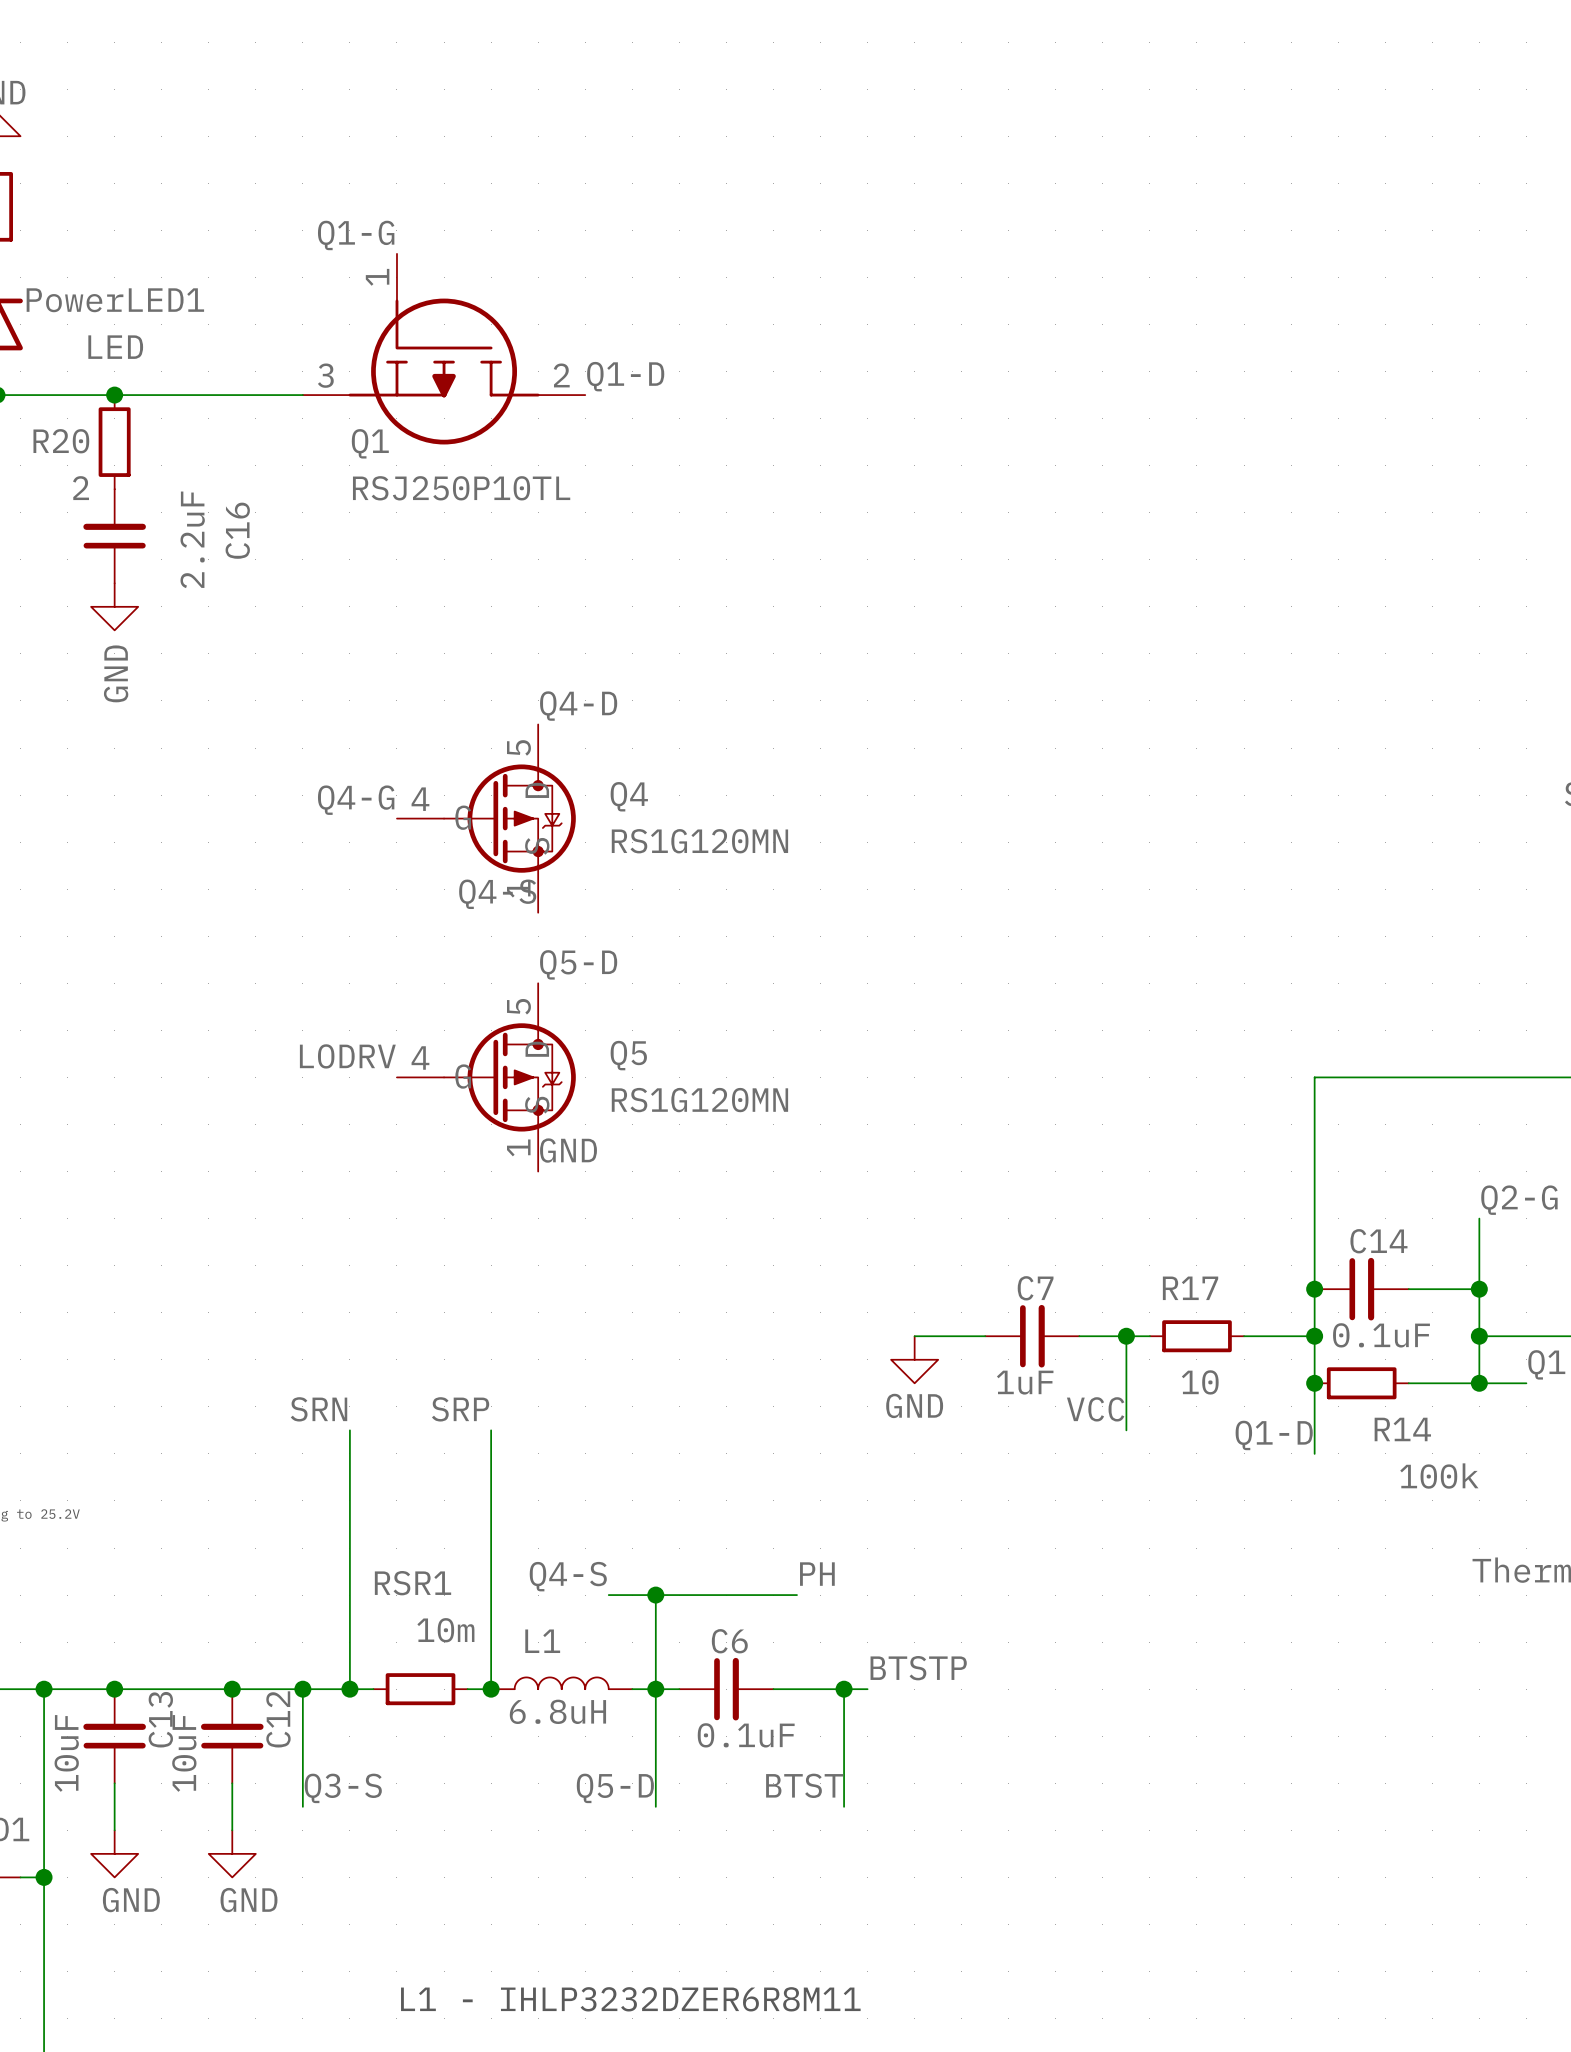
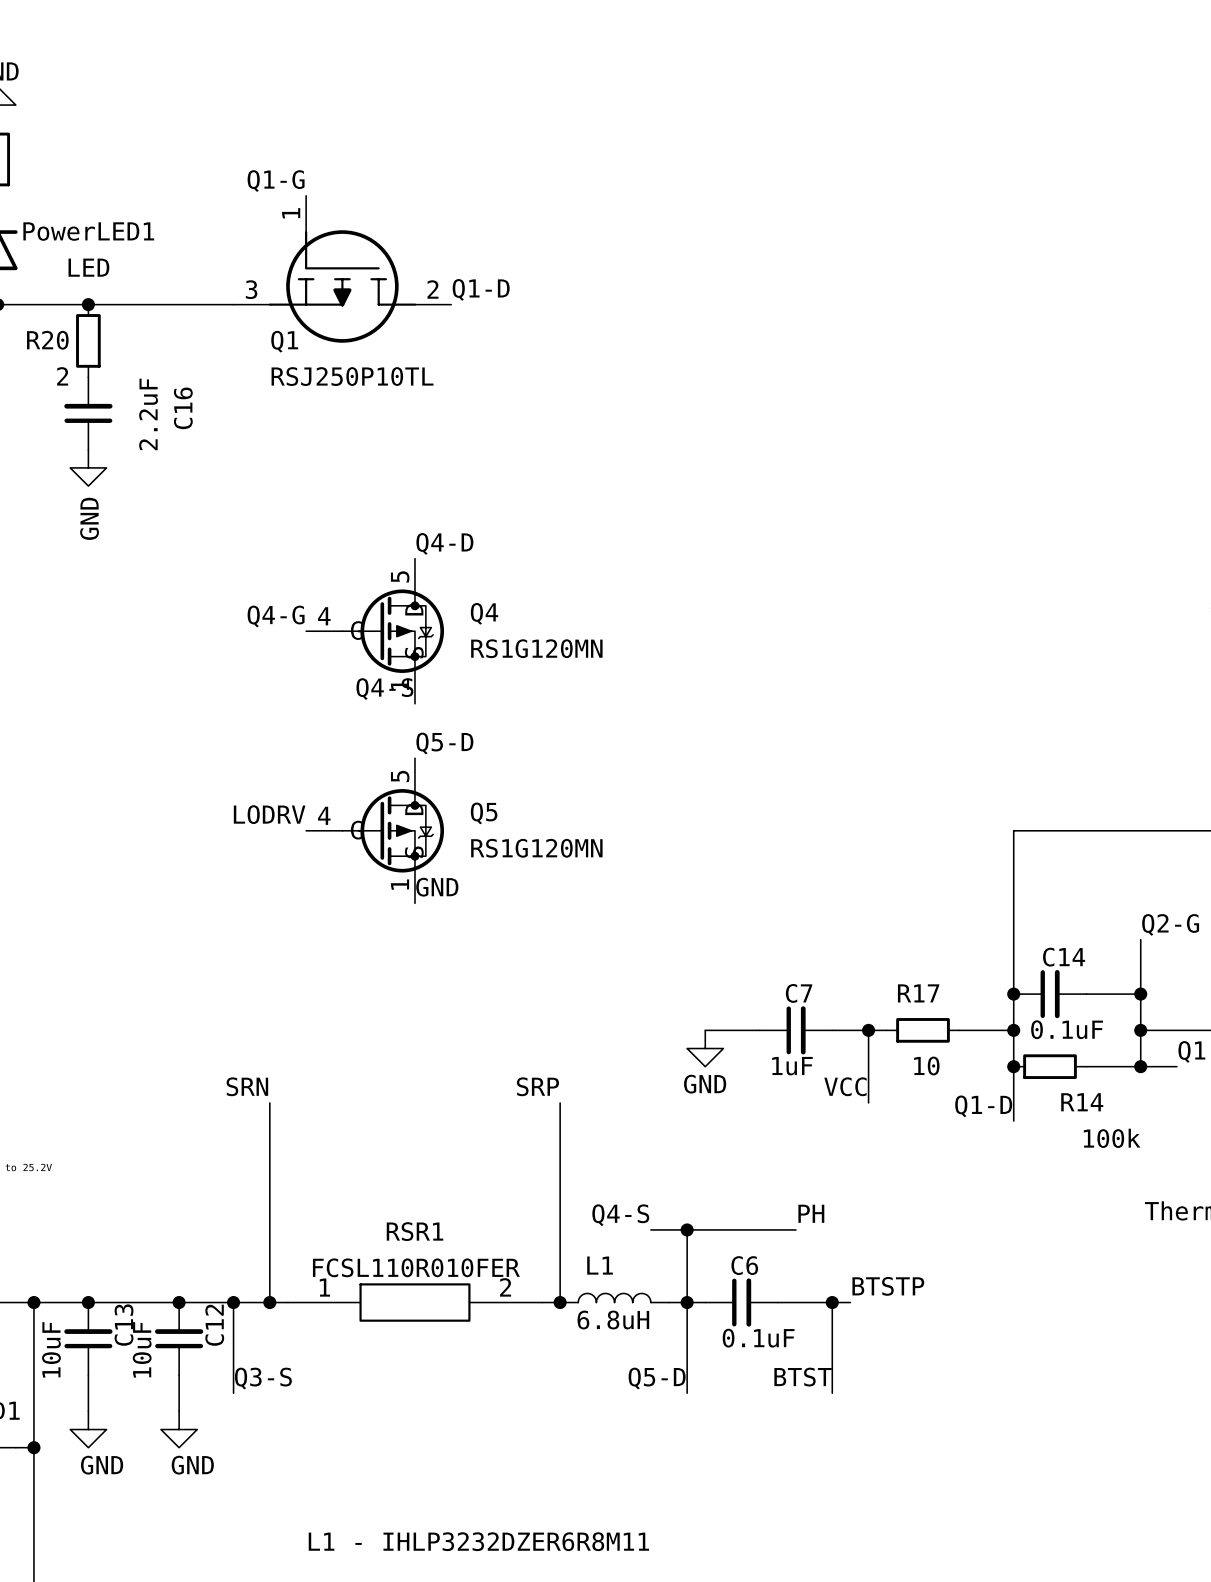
label position: SRP (460, 1409) -> SRP (537, 1086)
wire: (491, 1430) (491, 1689) (467, 1689) -> (560, 1102) (560, 1302) (541, 1302)
label position: PH (817, 1574) -> PH (811, 1213)
label position: Q4-S (568, 1576) -> Q4-S (620, 1215)
wire: (608, 1595) (796, 1595) -> (650, 1229) (796, 1229)
wire: (655, 1595) (655, 1806) -> (687, 1229) (687, 1393)
junction: (655, 1595) -> none
junction: none -> (687, 1229)
RSR1 value: 10m (445, 1630) -> FCSL110R010FER (416, 1267)
label position: BTSTP (918, 1668) -> BTSTP (888, 1286)
RSR1 symbol: [373, 1673, 468, 1706] -> [287, 1283, 542, 1322]
L1 position: (561, 1683) -> (614, 1297)
junction: (491, 1689) -> none
junction: (655, 1689) -> none
junction: none -> (560, 1302)
C6 position: (726, 1689) -> (741, 1302)
wire: (773, 1689) (867, 1689) -> (705, 1302) (668, 1302)
wire: (844, 1689) (844, 1806) -> (832, 1302) (832, 1393)
junction position: (844, 1689) -> (687, 1302)
wire: none -> (777, 1302) (850, 1302)
junction: none -> (832, 1302)
label position: BTST (804, 1785) -> BTST (803, 1377)
label position: Q5-D (615, 1788) -> Q5-D (657, 1378)

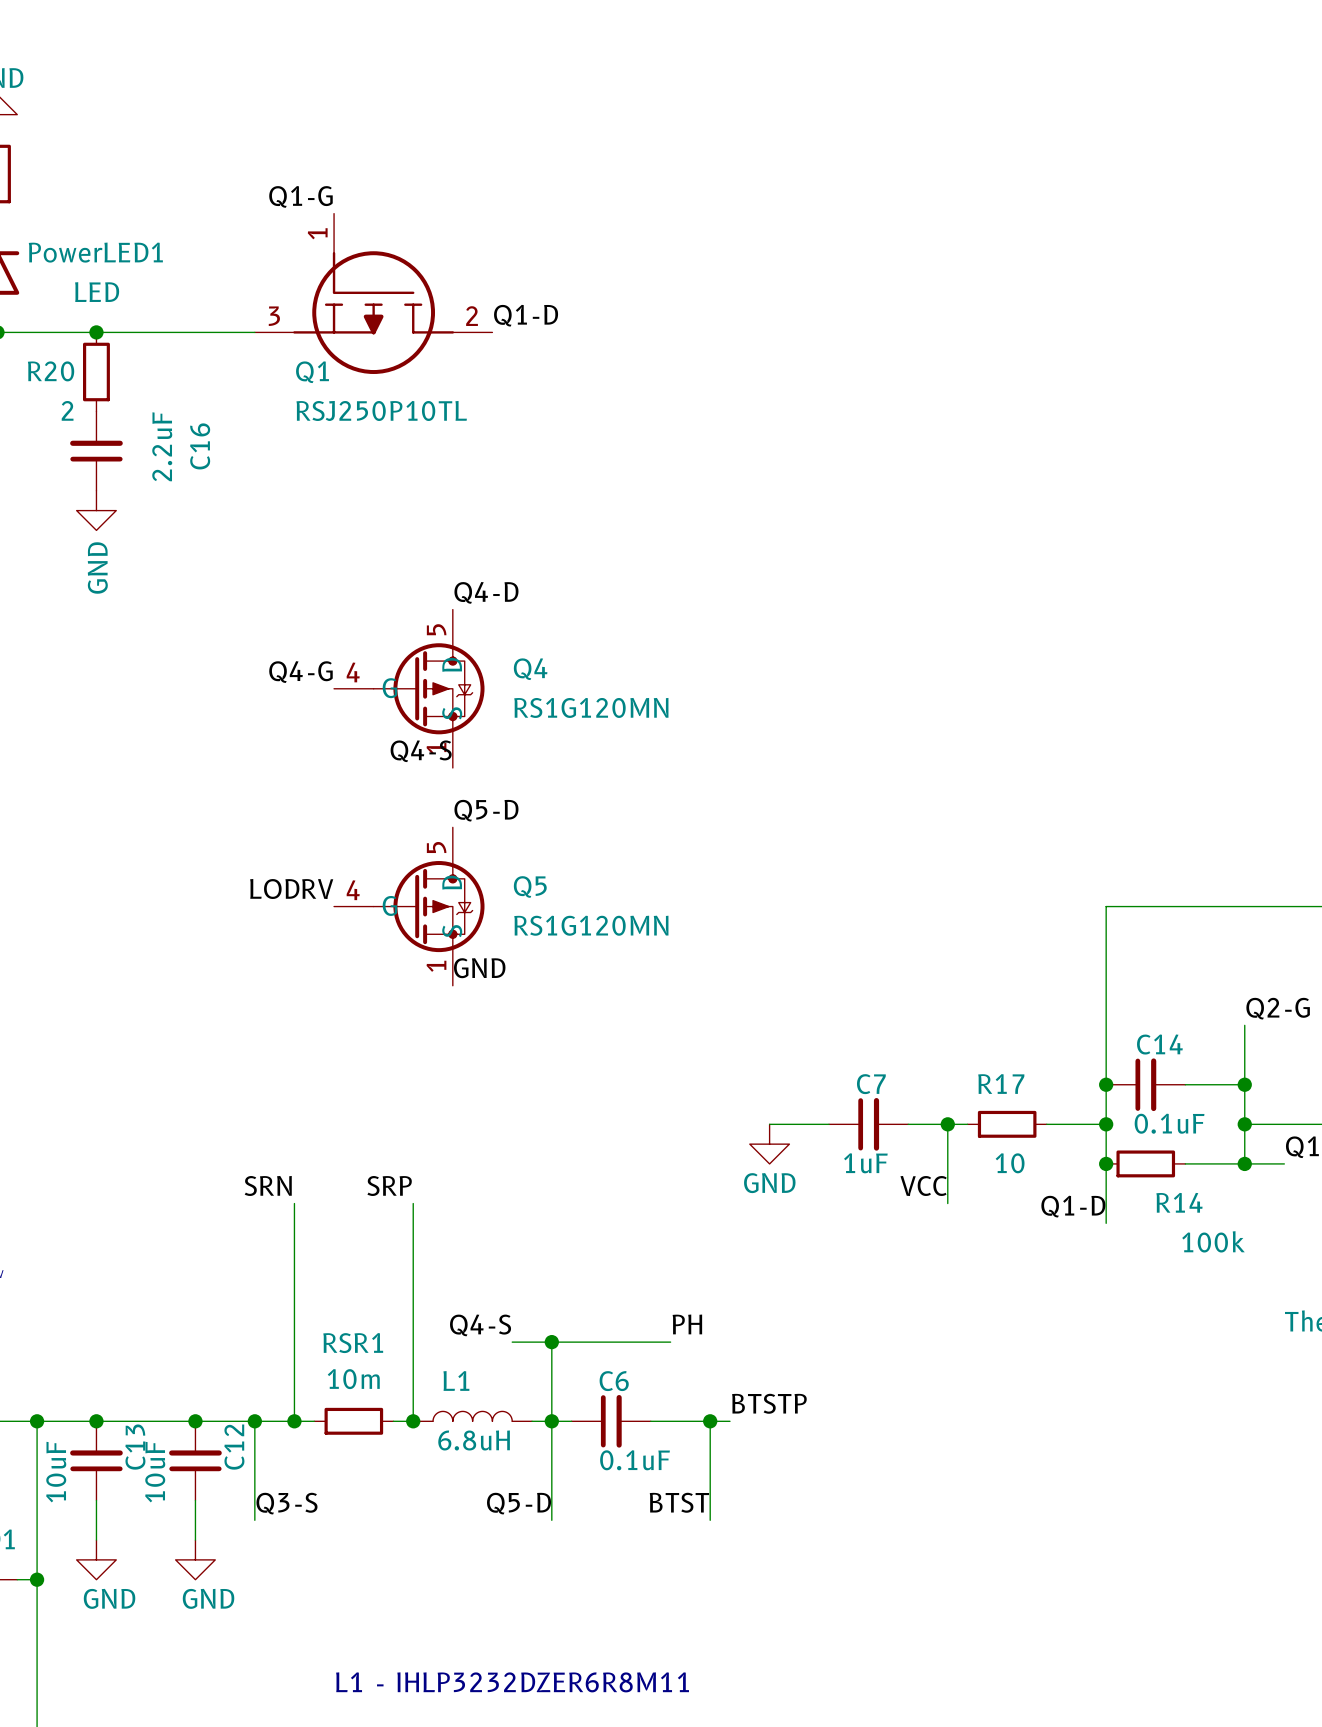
label position: SRP (537, 1086) -> SRP (389, 1185)
wire: (560, 1102) (560, 1302) (541, 1302) -> (413, 1203) (413, 1421) (393, 1421)
label position: PH (811, 1213) -> PH (687, 1324)
label position: Q4-S (620, 1215) -> Q4-S (480, 1325)
junction: none -> (551, 1342)
wire: (650, 1229) (796, 1229) -> (512, 1342) (670, 1342)
wire: (687, 1229) (687, 1393) -> (551, 1342) (551, 1520)
junction: (687, 1229) -> none
RSR1 value: FCSL110R010FER (416, 1267) -> 10m (353, 1379)
RSR1 symbol: [287, 1283, 542, 1322] -> [314, 1407, 394, 1435]
label position: BTSTP (888, 1286) -> BTSTP (769, 1403)
L1 position: (614, 1297) -> (472, 1416)
junction: none -> (413, 1421)
junction: none -> (551, 1421)
junction: (560, 1302) -> none
wire: (668, 1302) (705, 1302) -> (730, 1421) (650, 1421)
junction position: (687, 1302) -> (710, 1421)
C6 position: (741, 1302) -> (611, 1421)
wire: (777, 1302) (850, 1302) -> none
wire: (832, 1302) (832, 1393) -> (710, 1421) (710, 1520)
junction: (832, 1302) -> none
label position: BTST (803, 1377) -> BTST (679, 1502)
label position: Q5-D (657, 1378) -> Q5-D (519, 1503)

